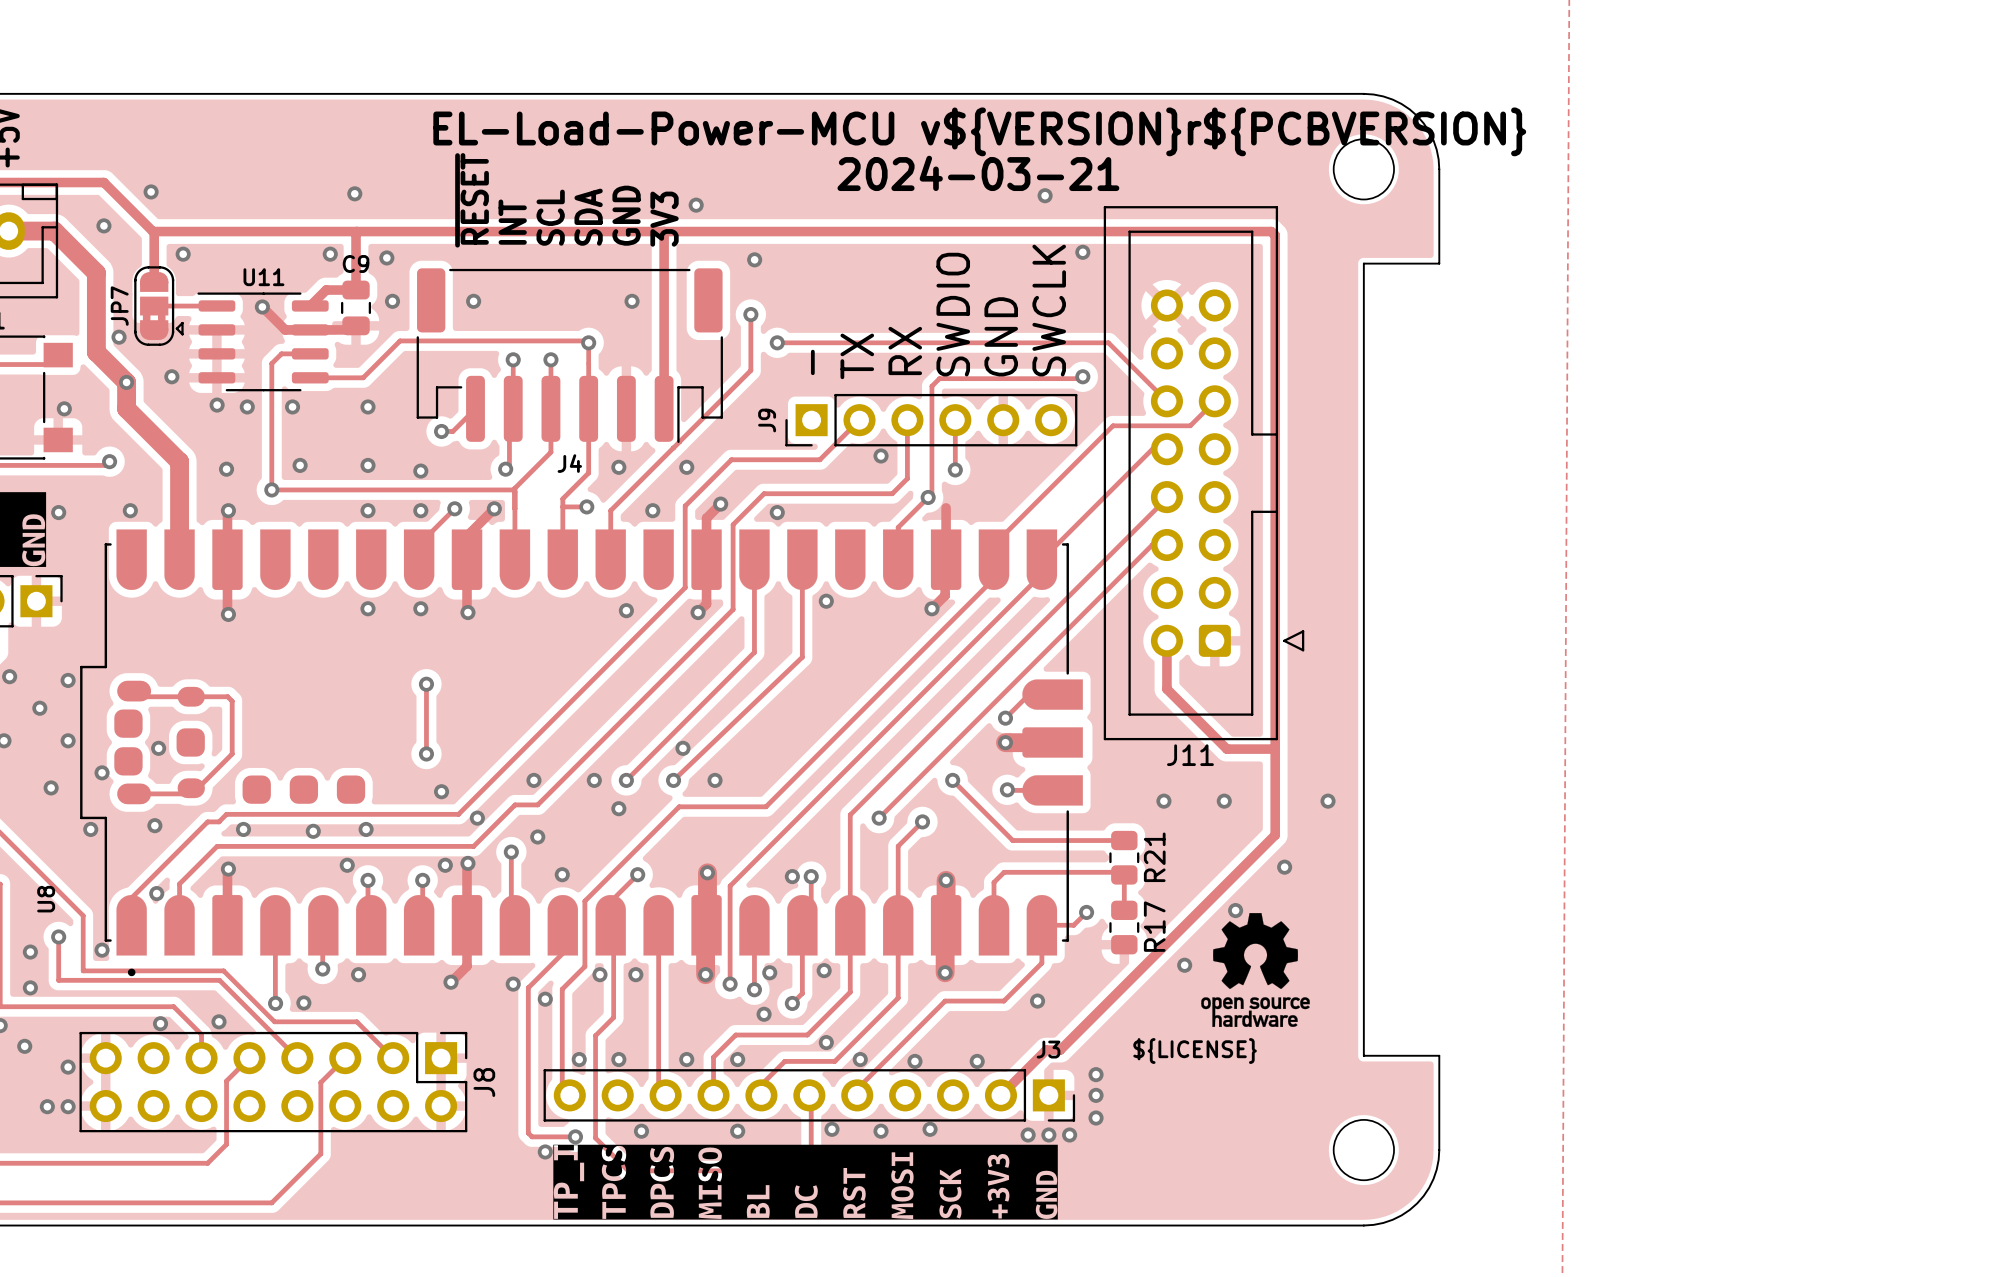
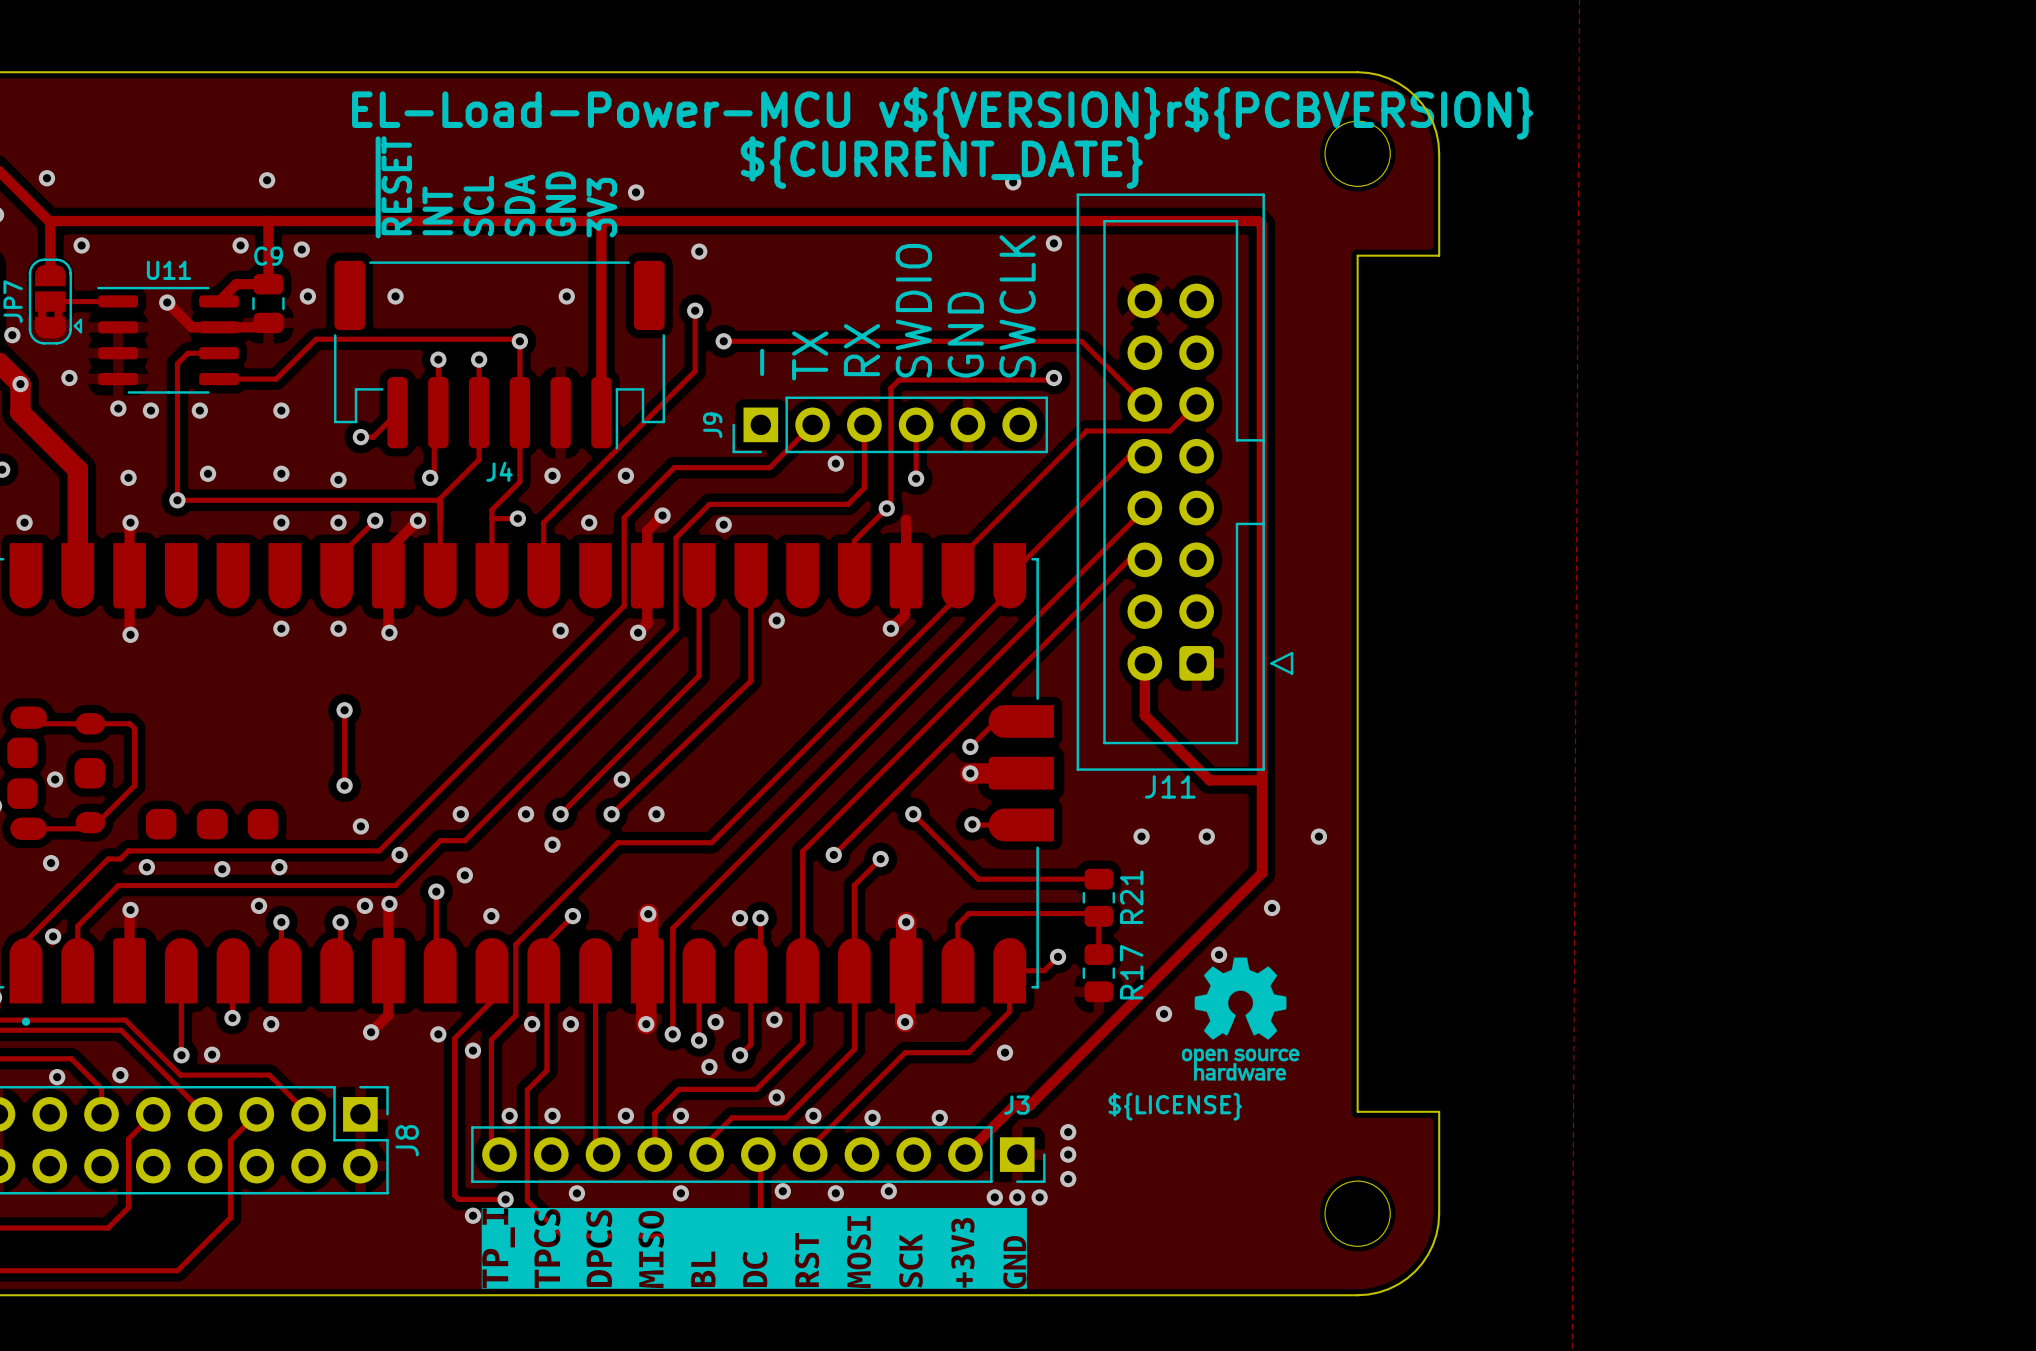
text: 2024-03-21 (978, 173) -> ${CURRENT_DATE} (941, 162)

